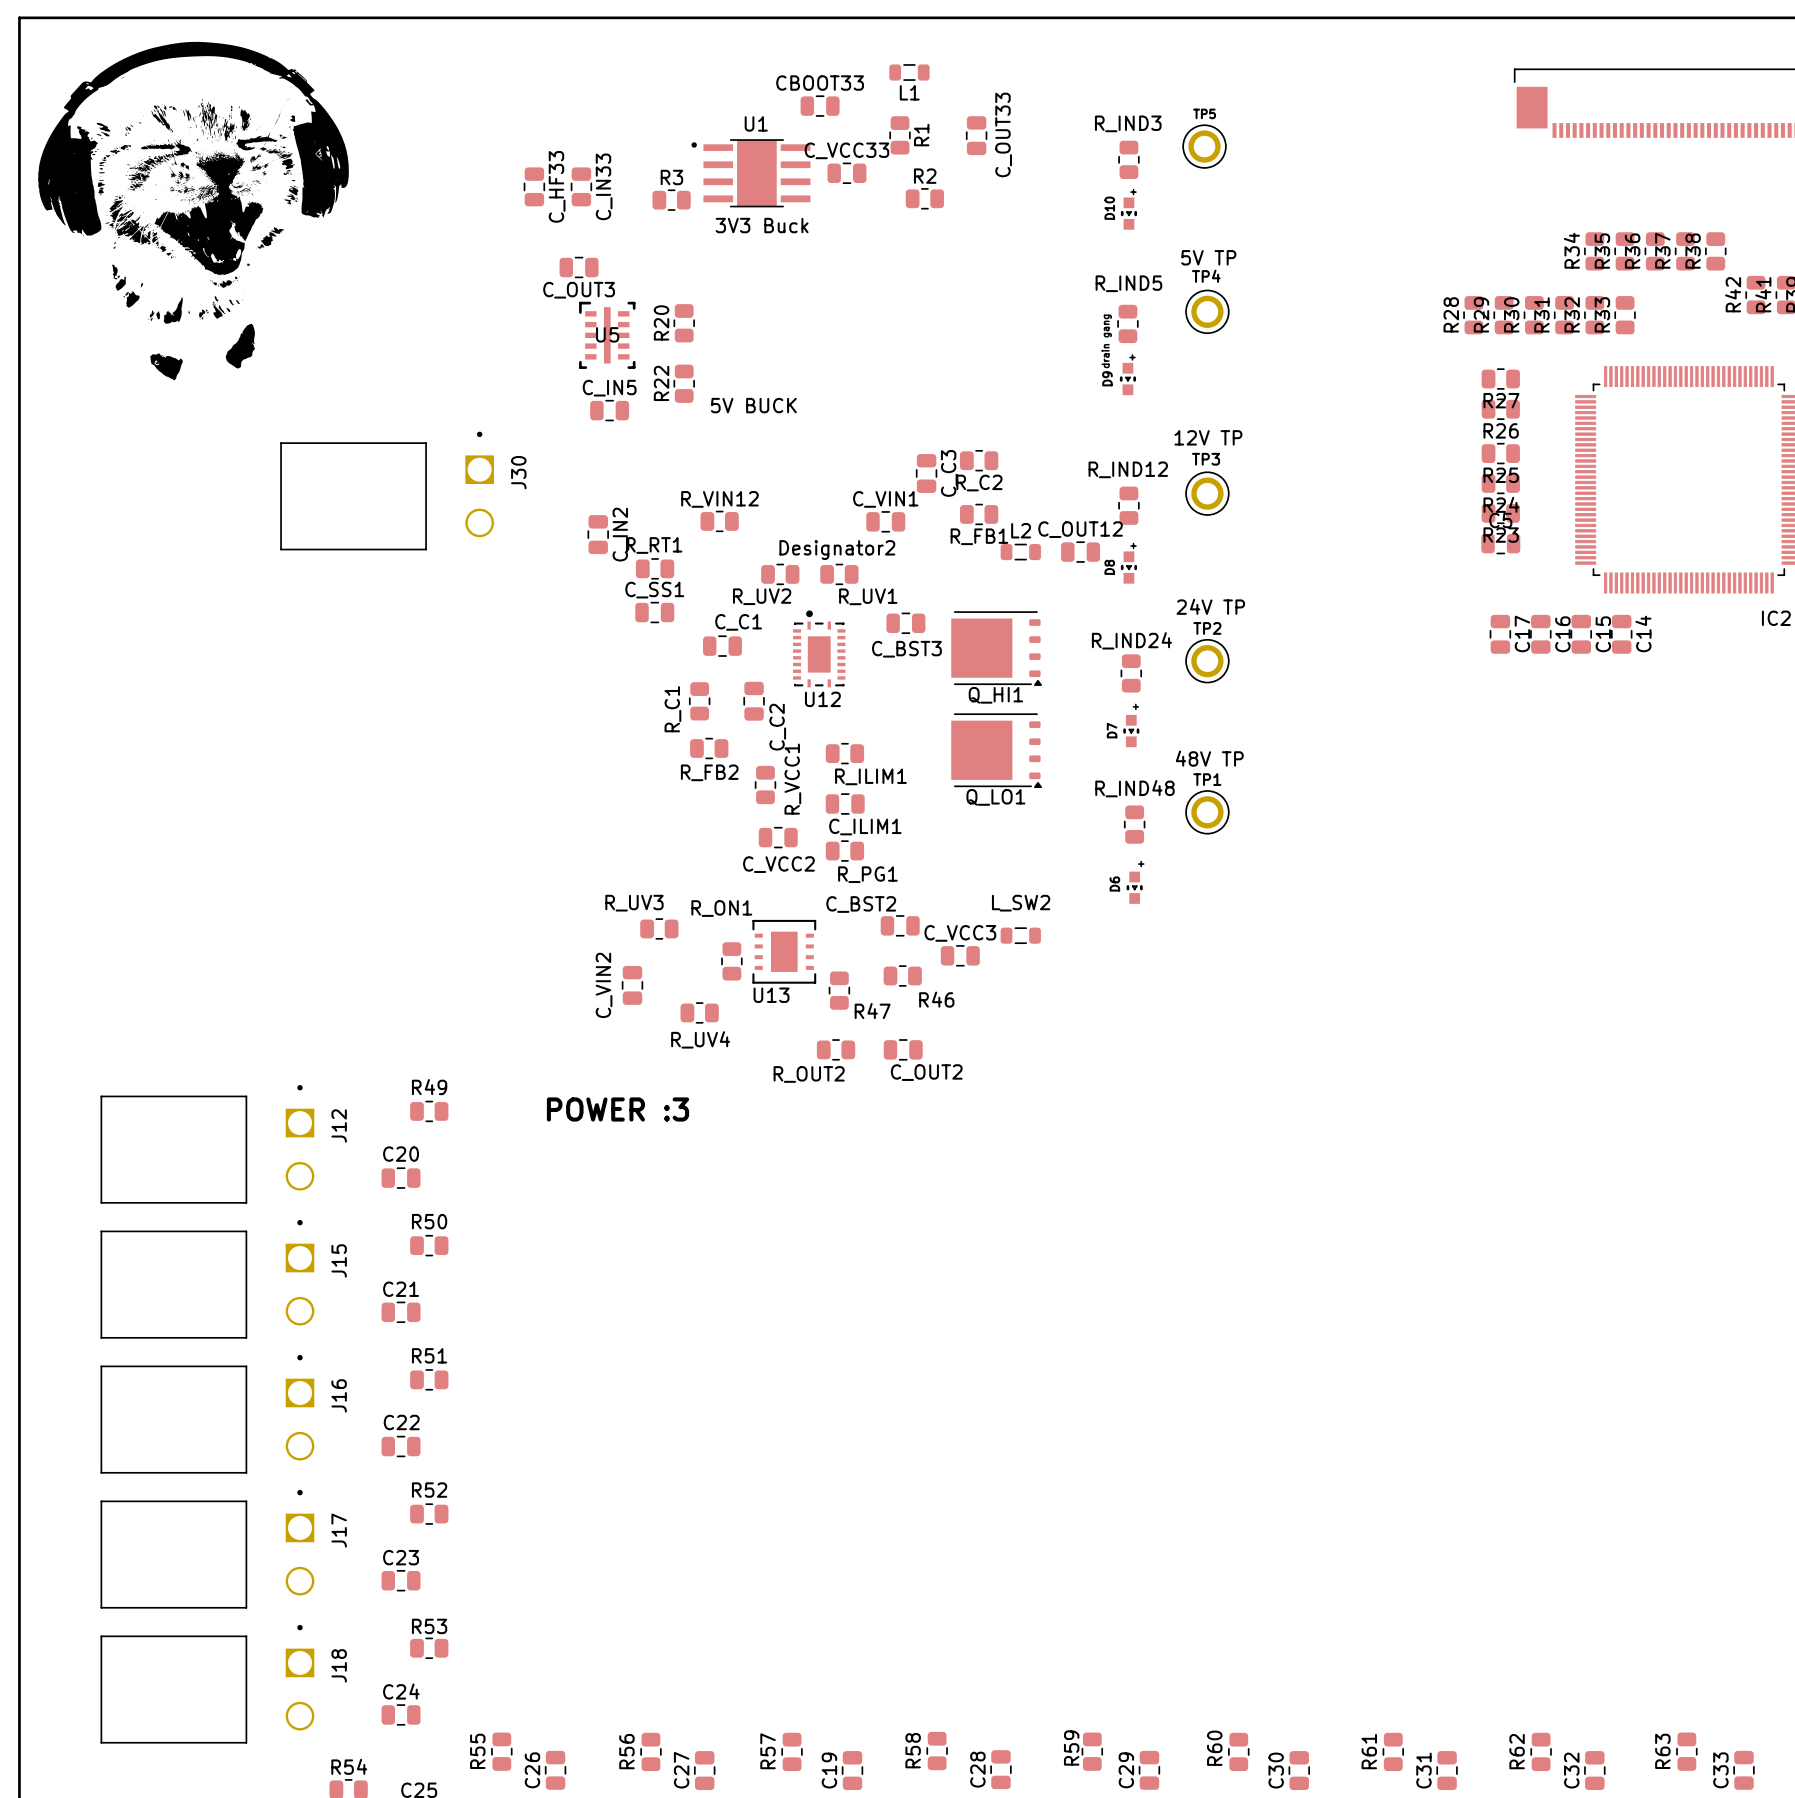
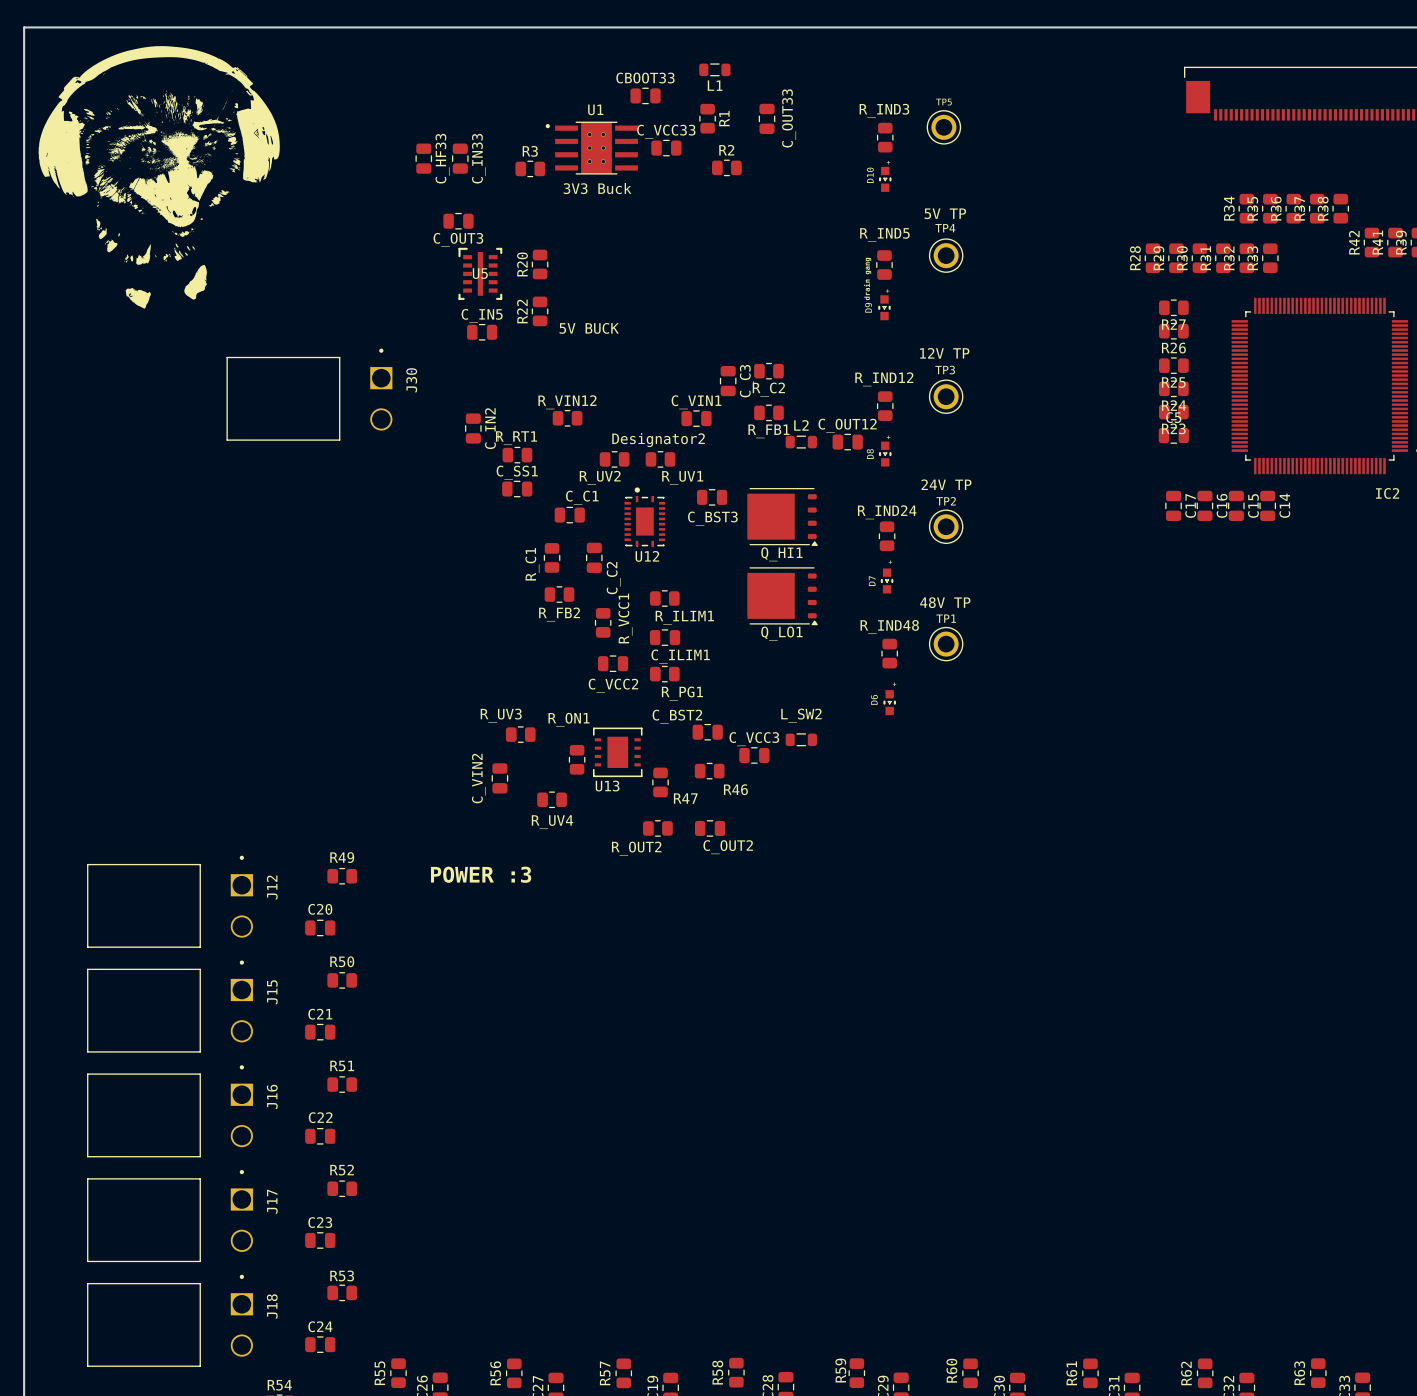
U1 footprint: [691, 139, 811, 208] -> [545, 121, 638, 175]

